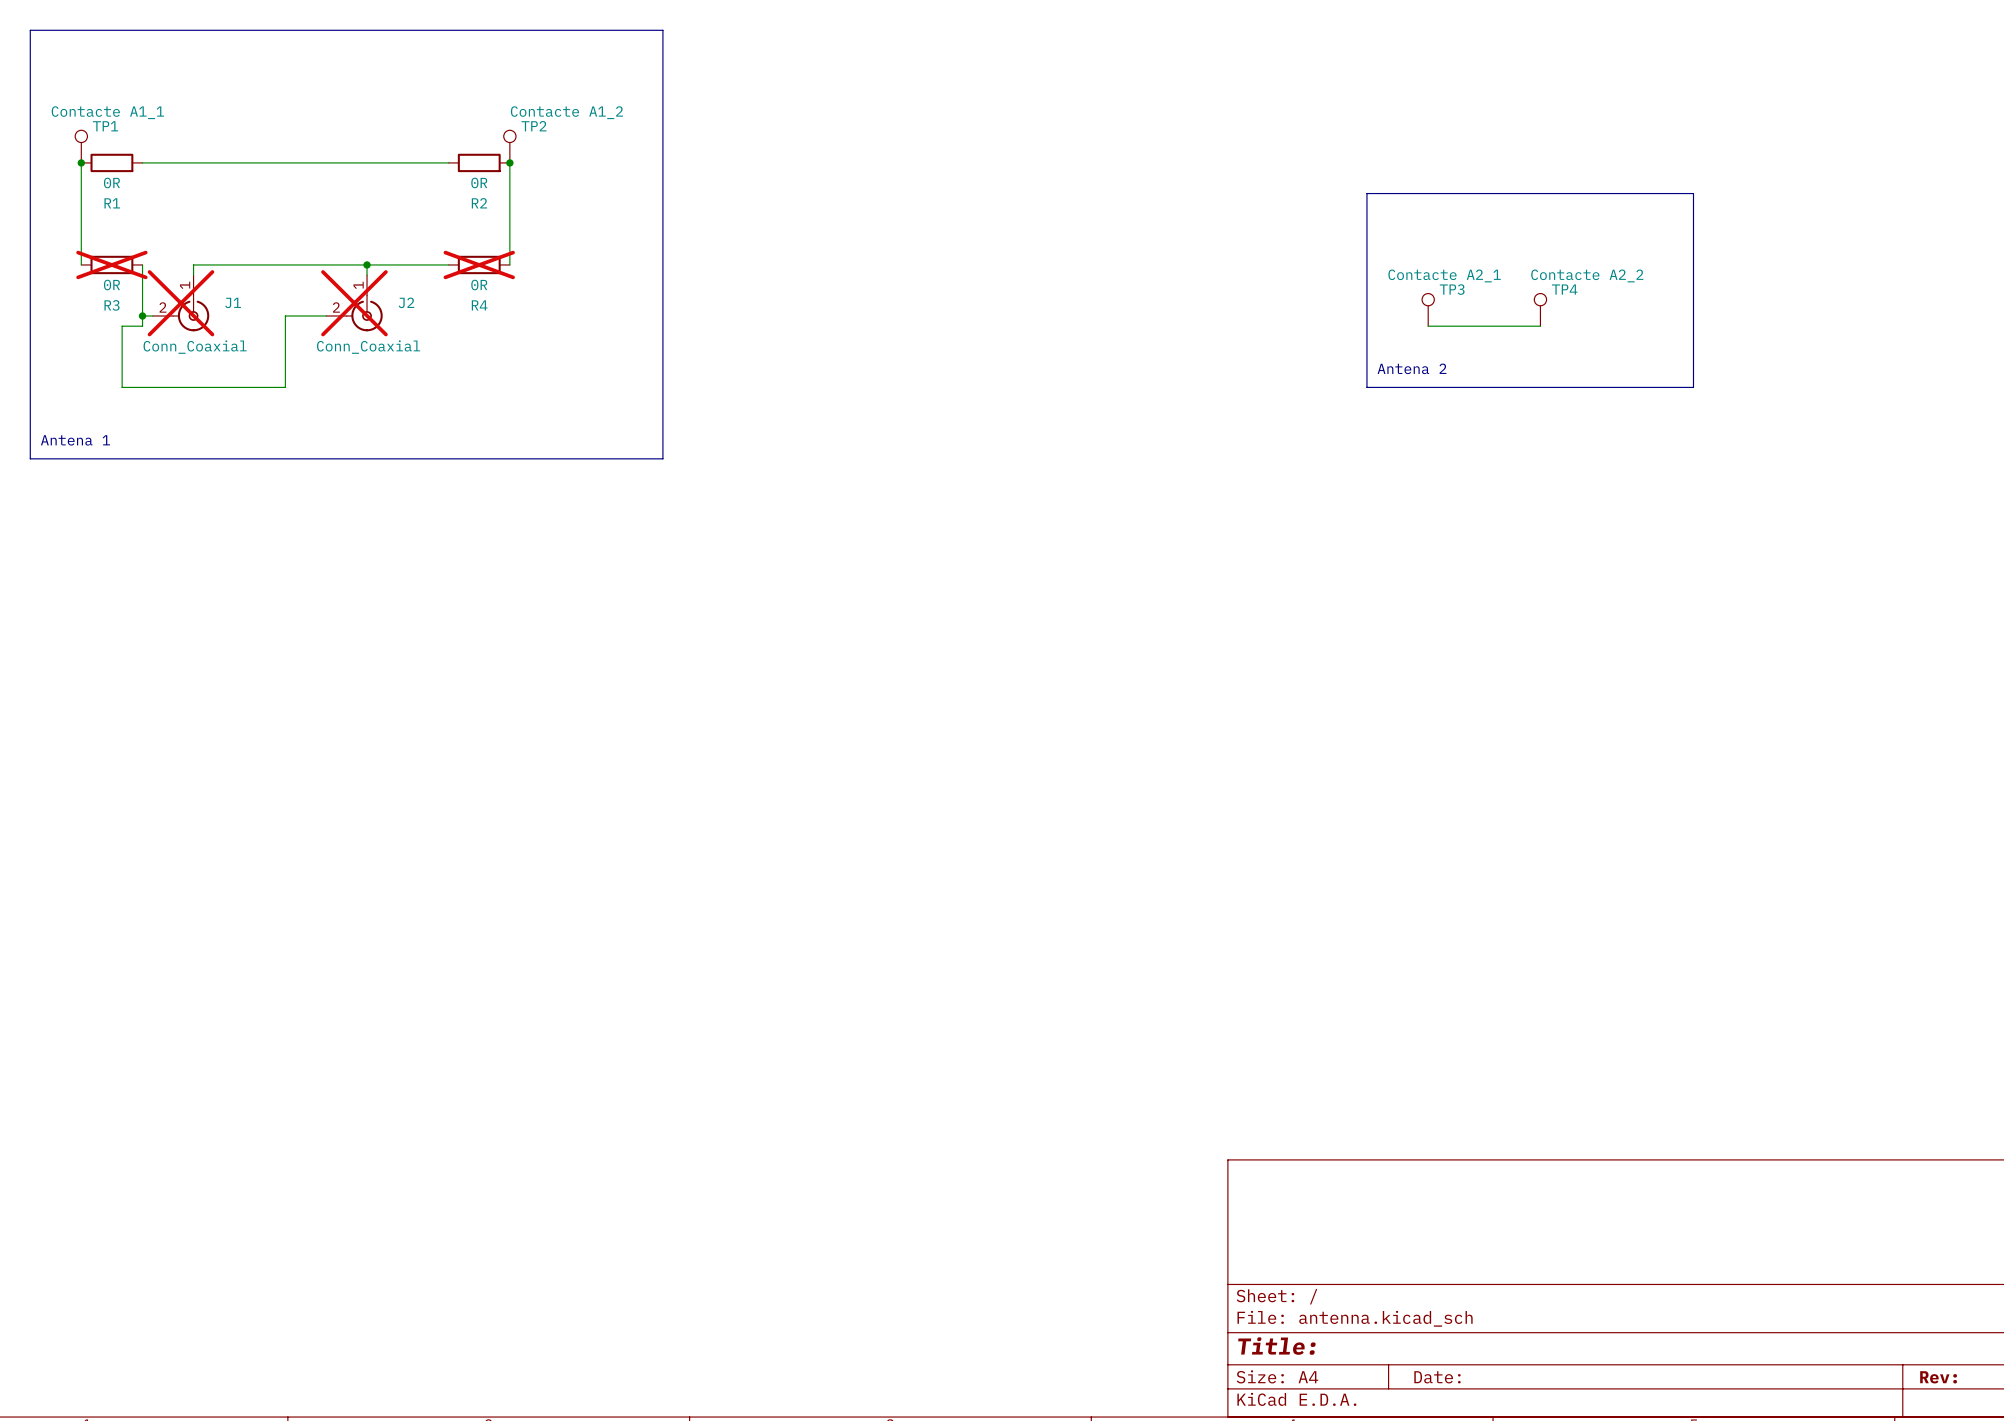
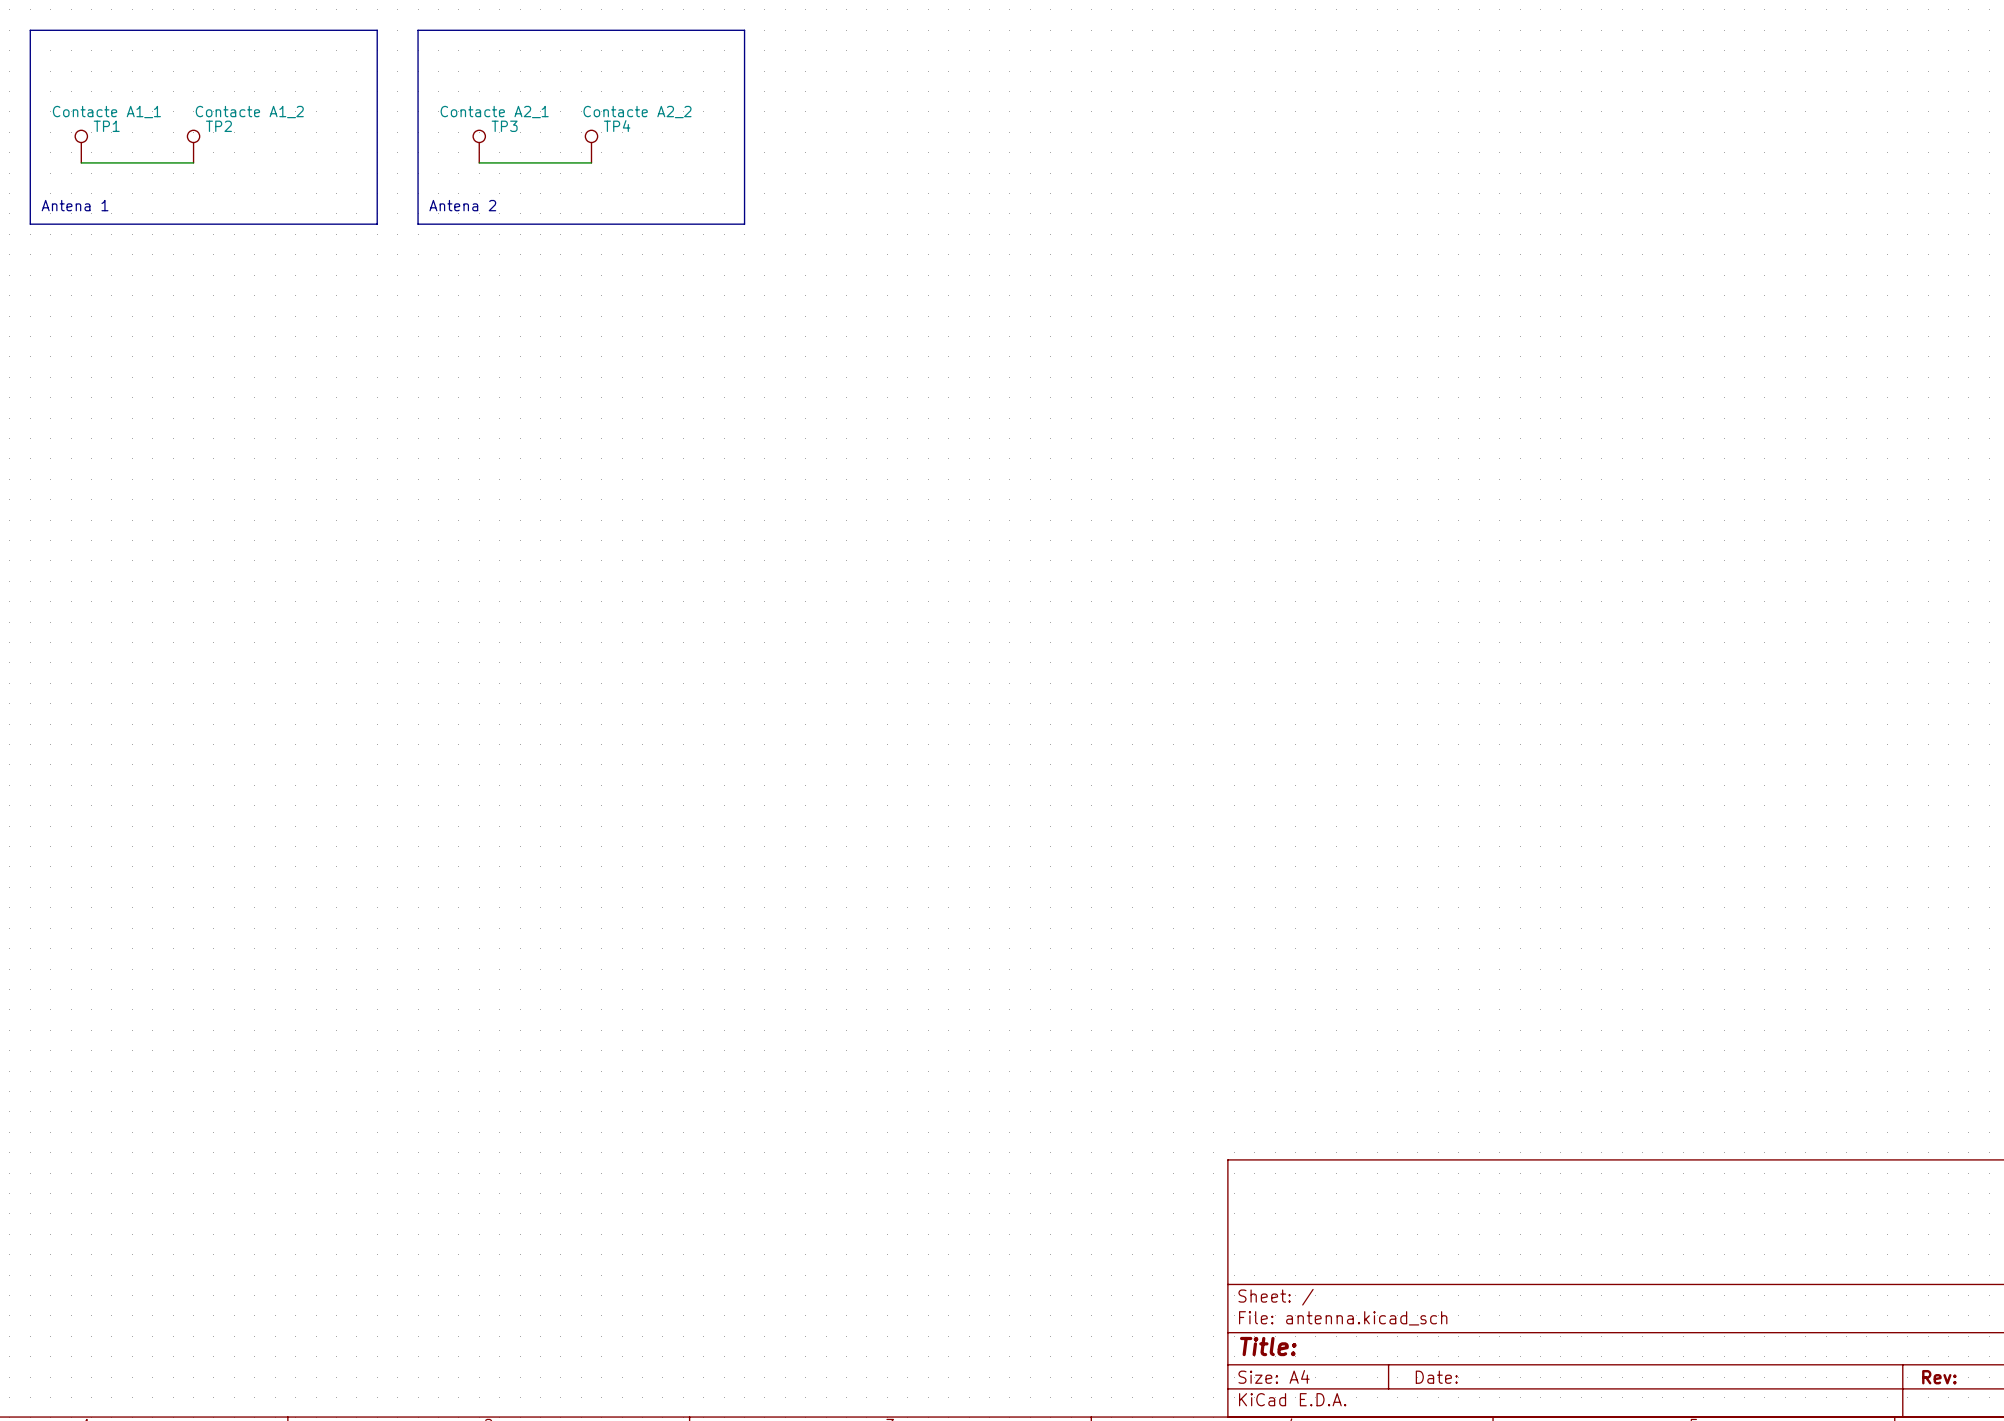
line: (377, 30) (418, 30) -> (662, 30) (744, 30) (744, 224) (418, 224) (418, 30)
line: (662, 30) (662, 458) (30, 458) (30, 224) -> (377, 30) (377, 224) (30, 224)
TP2 position: (509, 146) -> (193, 146)
wire: (81, 162) (81, 264) -> (81, 162) (142, 162)
junction: (81, 162) -> none
R1: 0R (111, 162) -> none
wire: (193, 162) (448, 162) -> none
wire: none -> (479, 162) (591, 162)
R2: 0R (479, 162) -> none
wire: (509, 162) (509, 264) -> none
junction: (509, 162) -> none
line: (1366, 193) (1693, 193) (1693, 387) (1366, 387) (1366, 193) -> none
text: none -> Antena 1 (75, 205)
text: none -> Antena 2 (462, 205)
R3: 0R (111, 264) -> none
wire: (142, 264) (142, 326) (122, 326) (122, 387) (285, 387) (285, 316) (326, 316) -> none
wire: (367, 264) (367, 275) -> none
junction: (367, 264) -> none
wire: (448, 264) (193, 264) (193, 275) -> none
R4: 0R (479, 264) -> none
J1: Conn_Coaxial (180, 303) -> none
J2: Conn_Coaxial (354, 303) -> none
TP3 position: (1428, 309) -> (479, 146)
TP4 position: (1540, 309) -> (591, 146)
wire: (142, 316) (152, 316) -> none
junction: (142, 316) -> none
wire: (1428, 326) (1540, 326) -> none
text: Antena 2 (1412, 368) -> none
text: Antena 1 (75, 440) -> none

